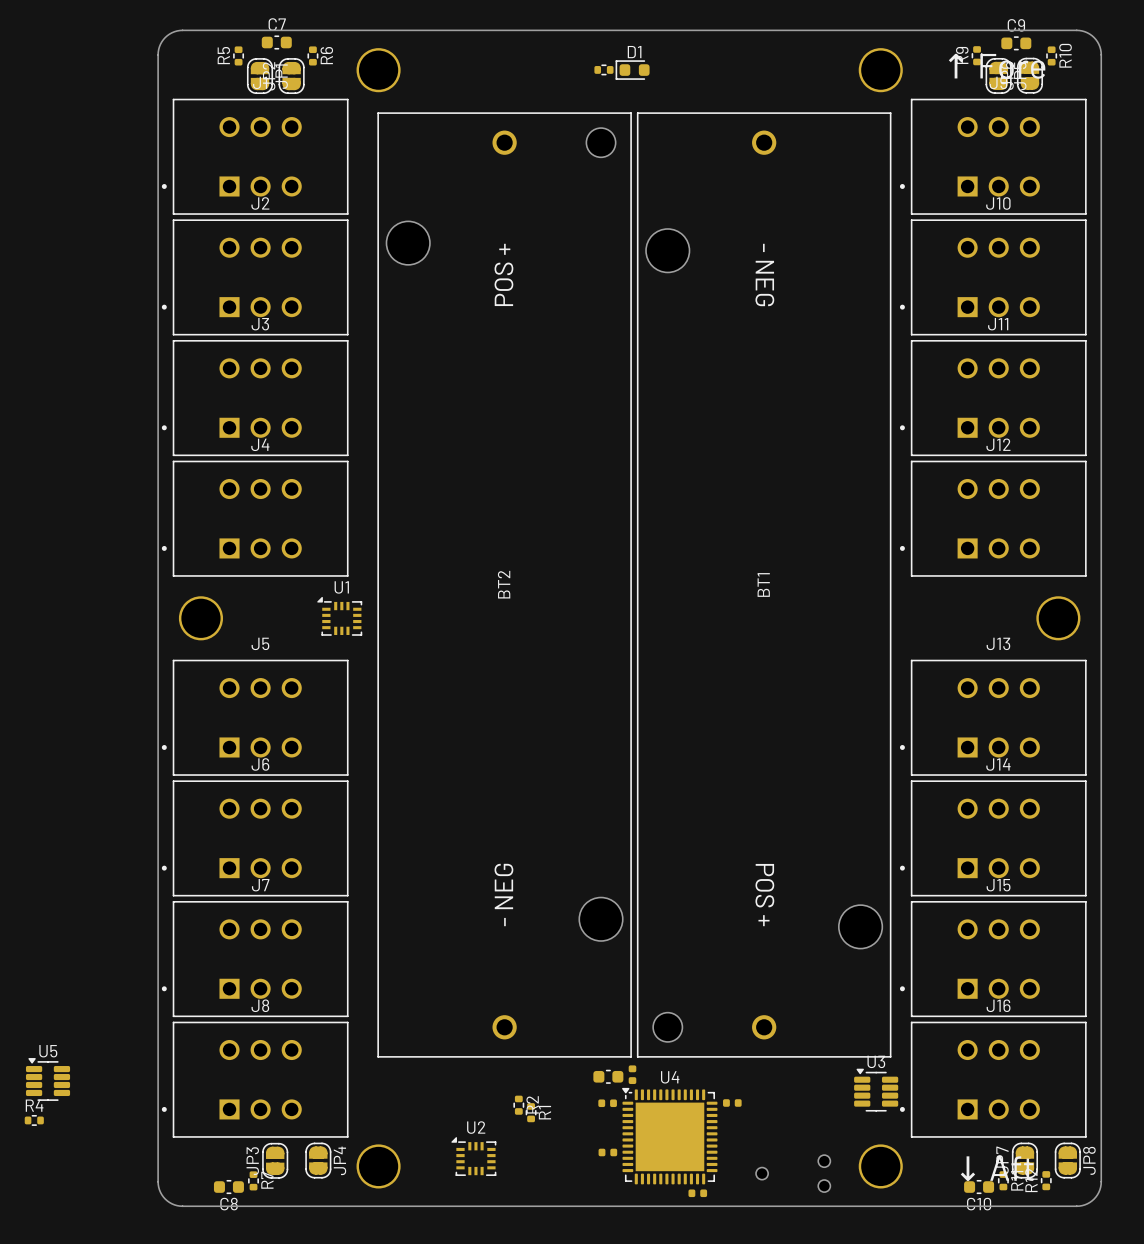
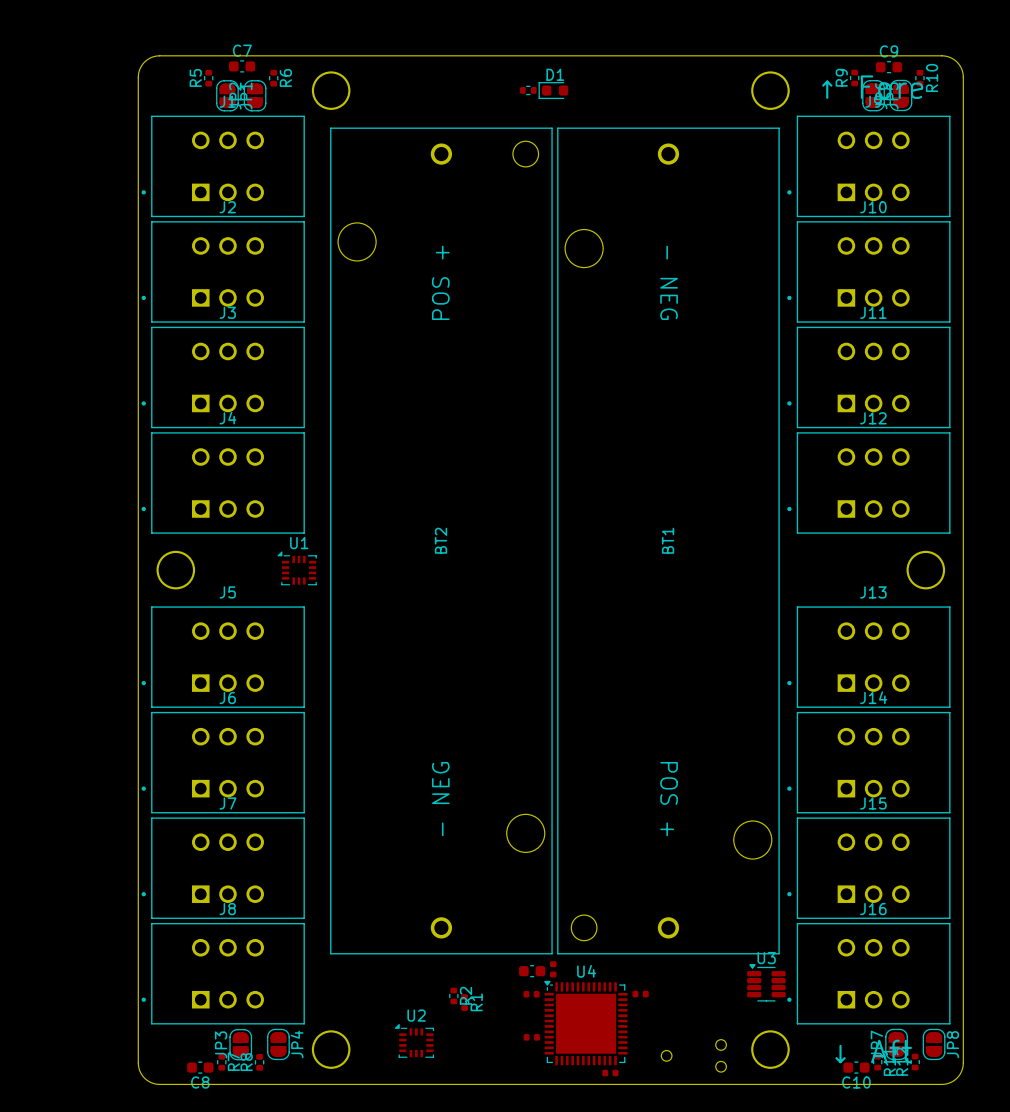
U5: (48, 1079) -> none
R4: (34, 1120) -> none
R8: none -> (259, 1062)

